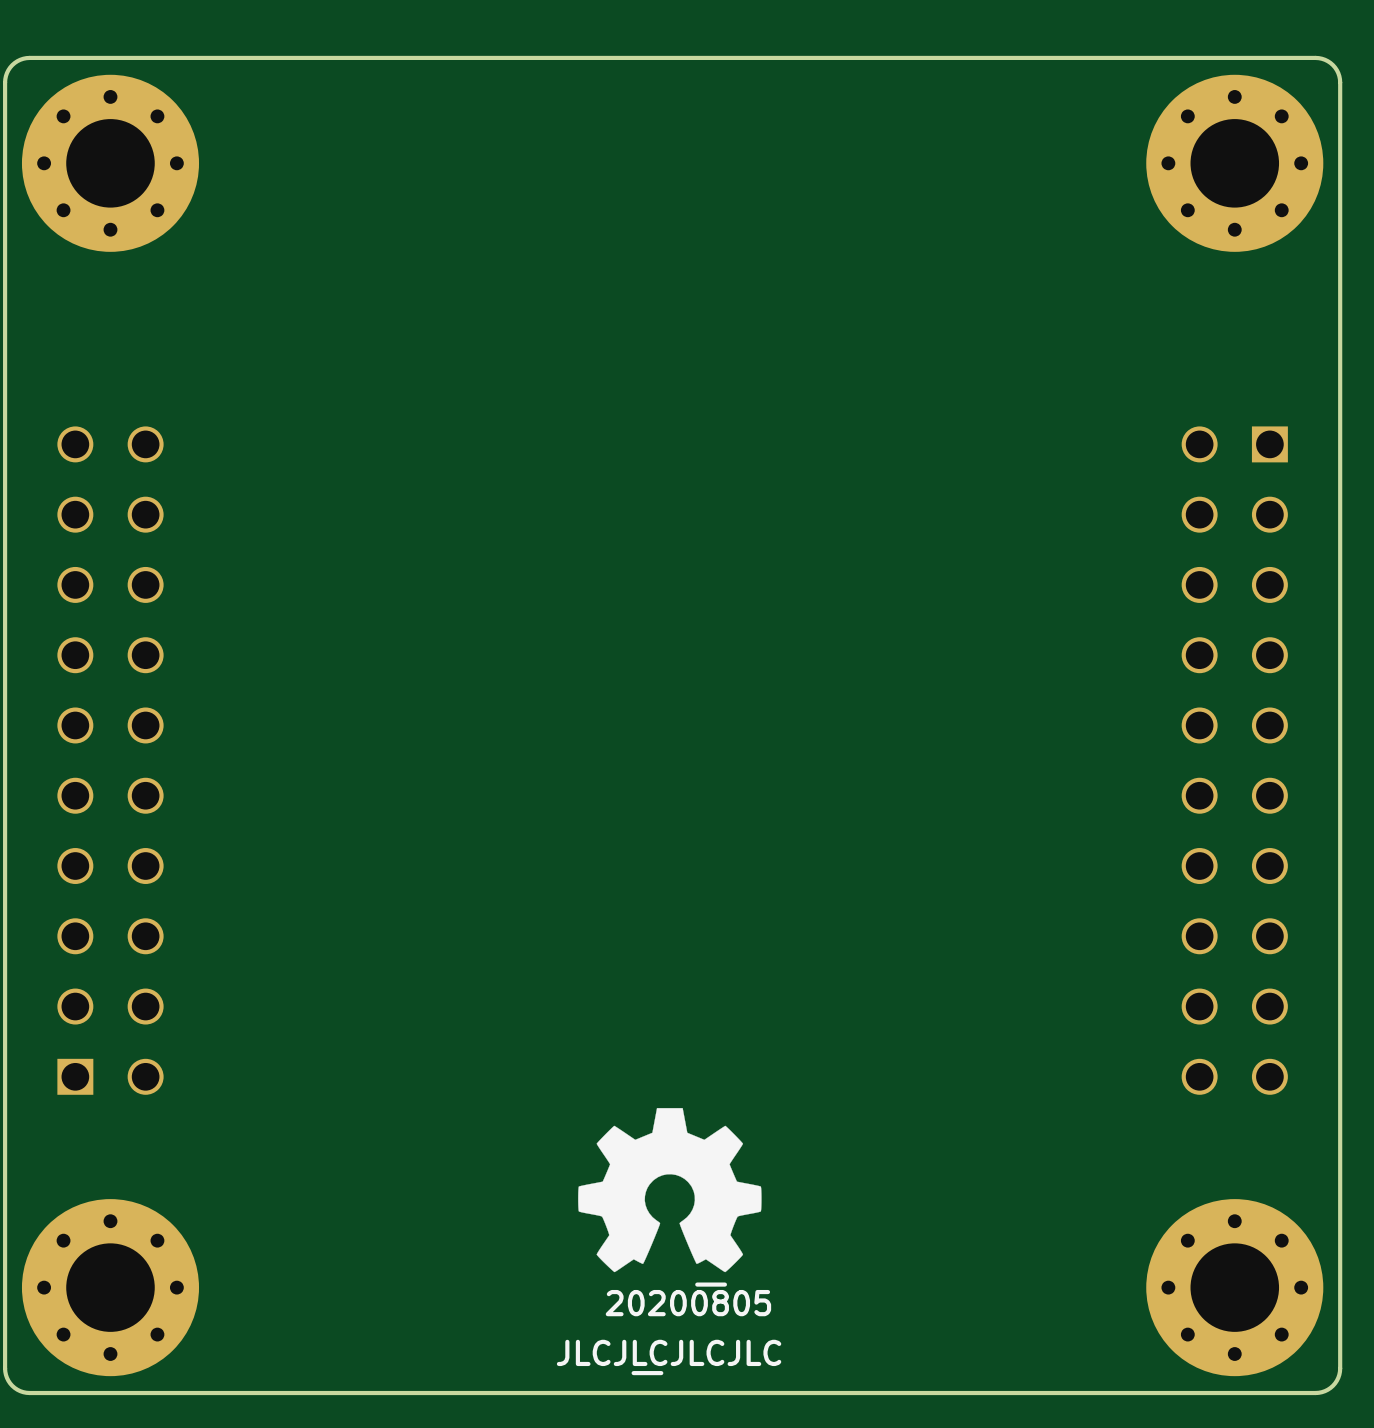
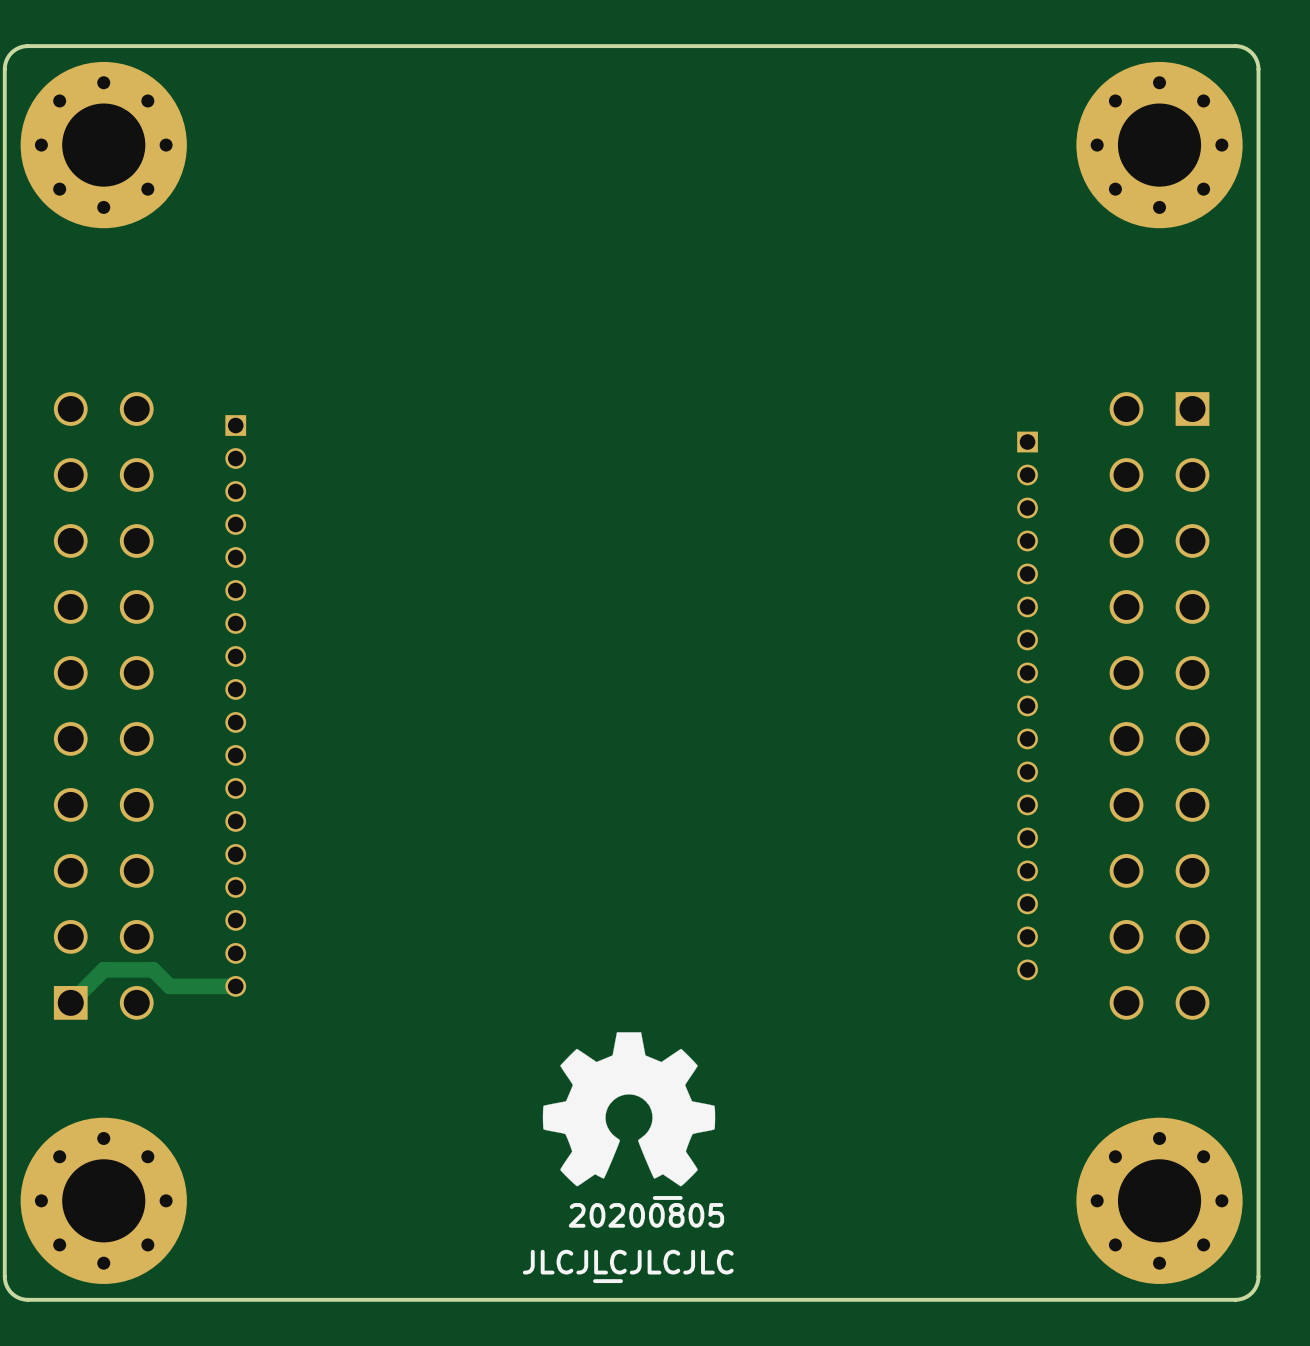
part: none -> (235, 705)
part: none -> (1027, 705)
track: none -> (235, 986) (169, 986) (153, 969) (103, 969) (70, 1002)

